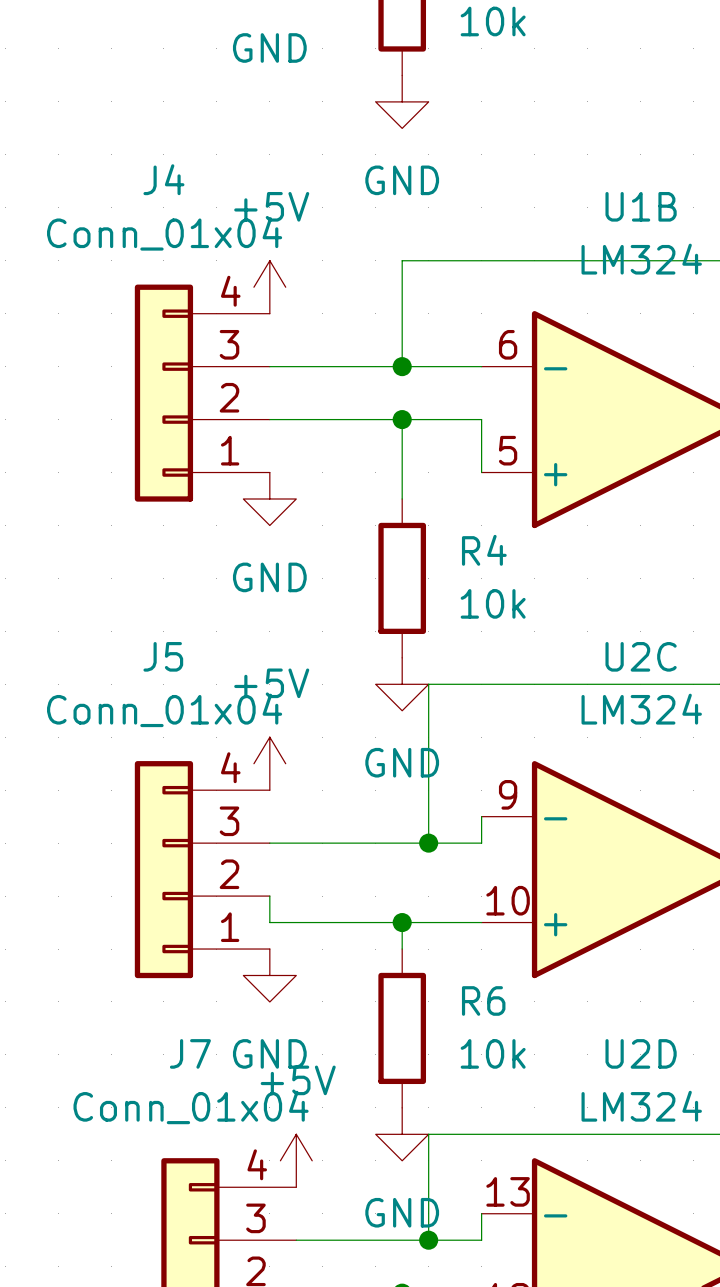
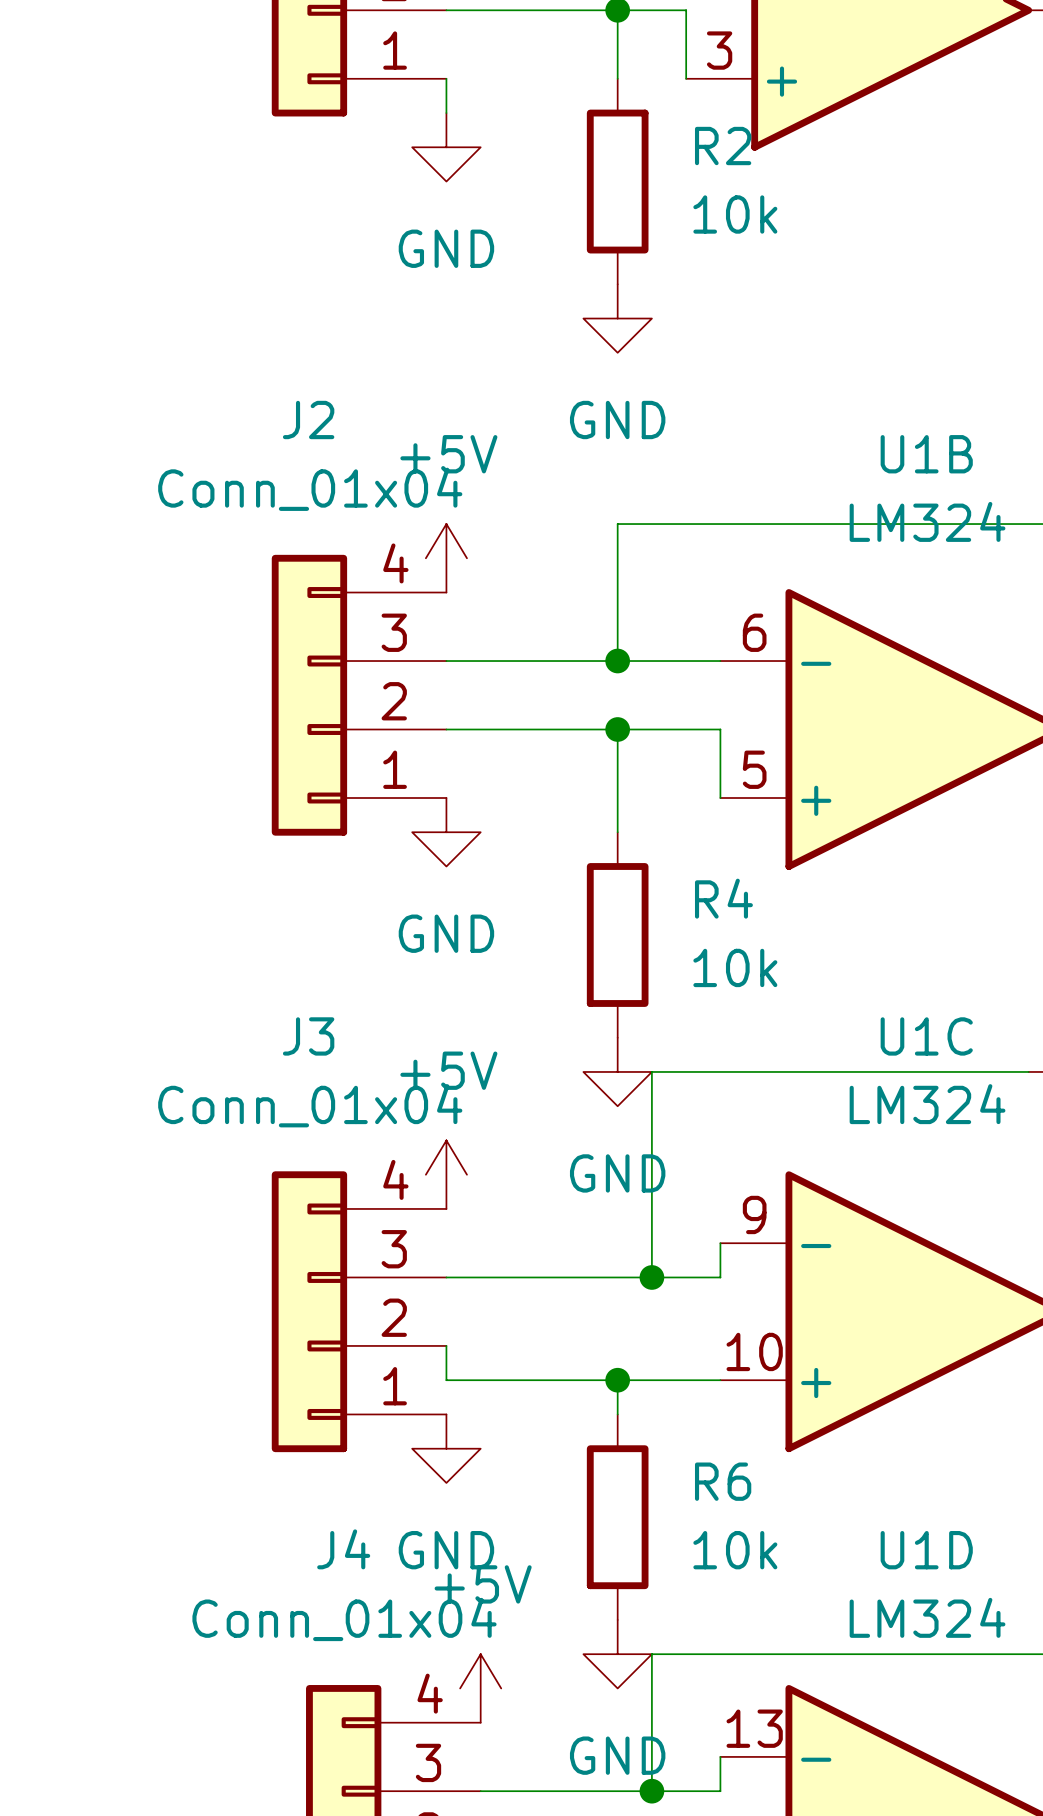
J4 name: J4 (163, 179) -> J2 (308, 419)
J5 name: J5 (163, 656) -> J3 (308, 1036)
U2C name: U2C (641, 656) -> U1C (926, 1036)
J7 name: J7 (190, 1053) -> J4 (343, 1549)
U2D name: U2D (641, 1053) -> U1D (926, 1550)

